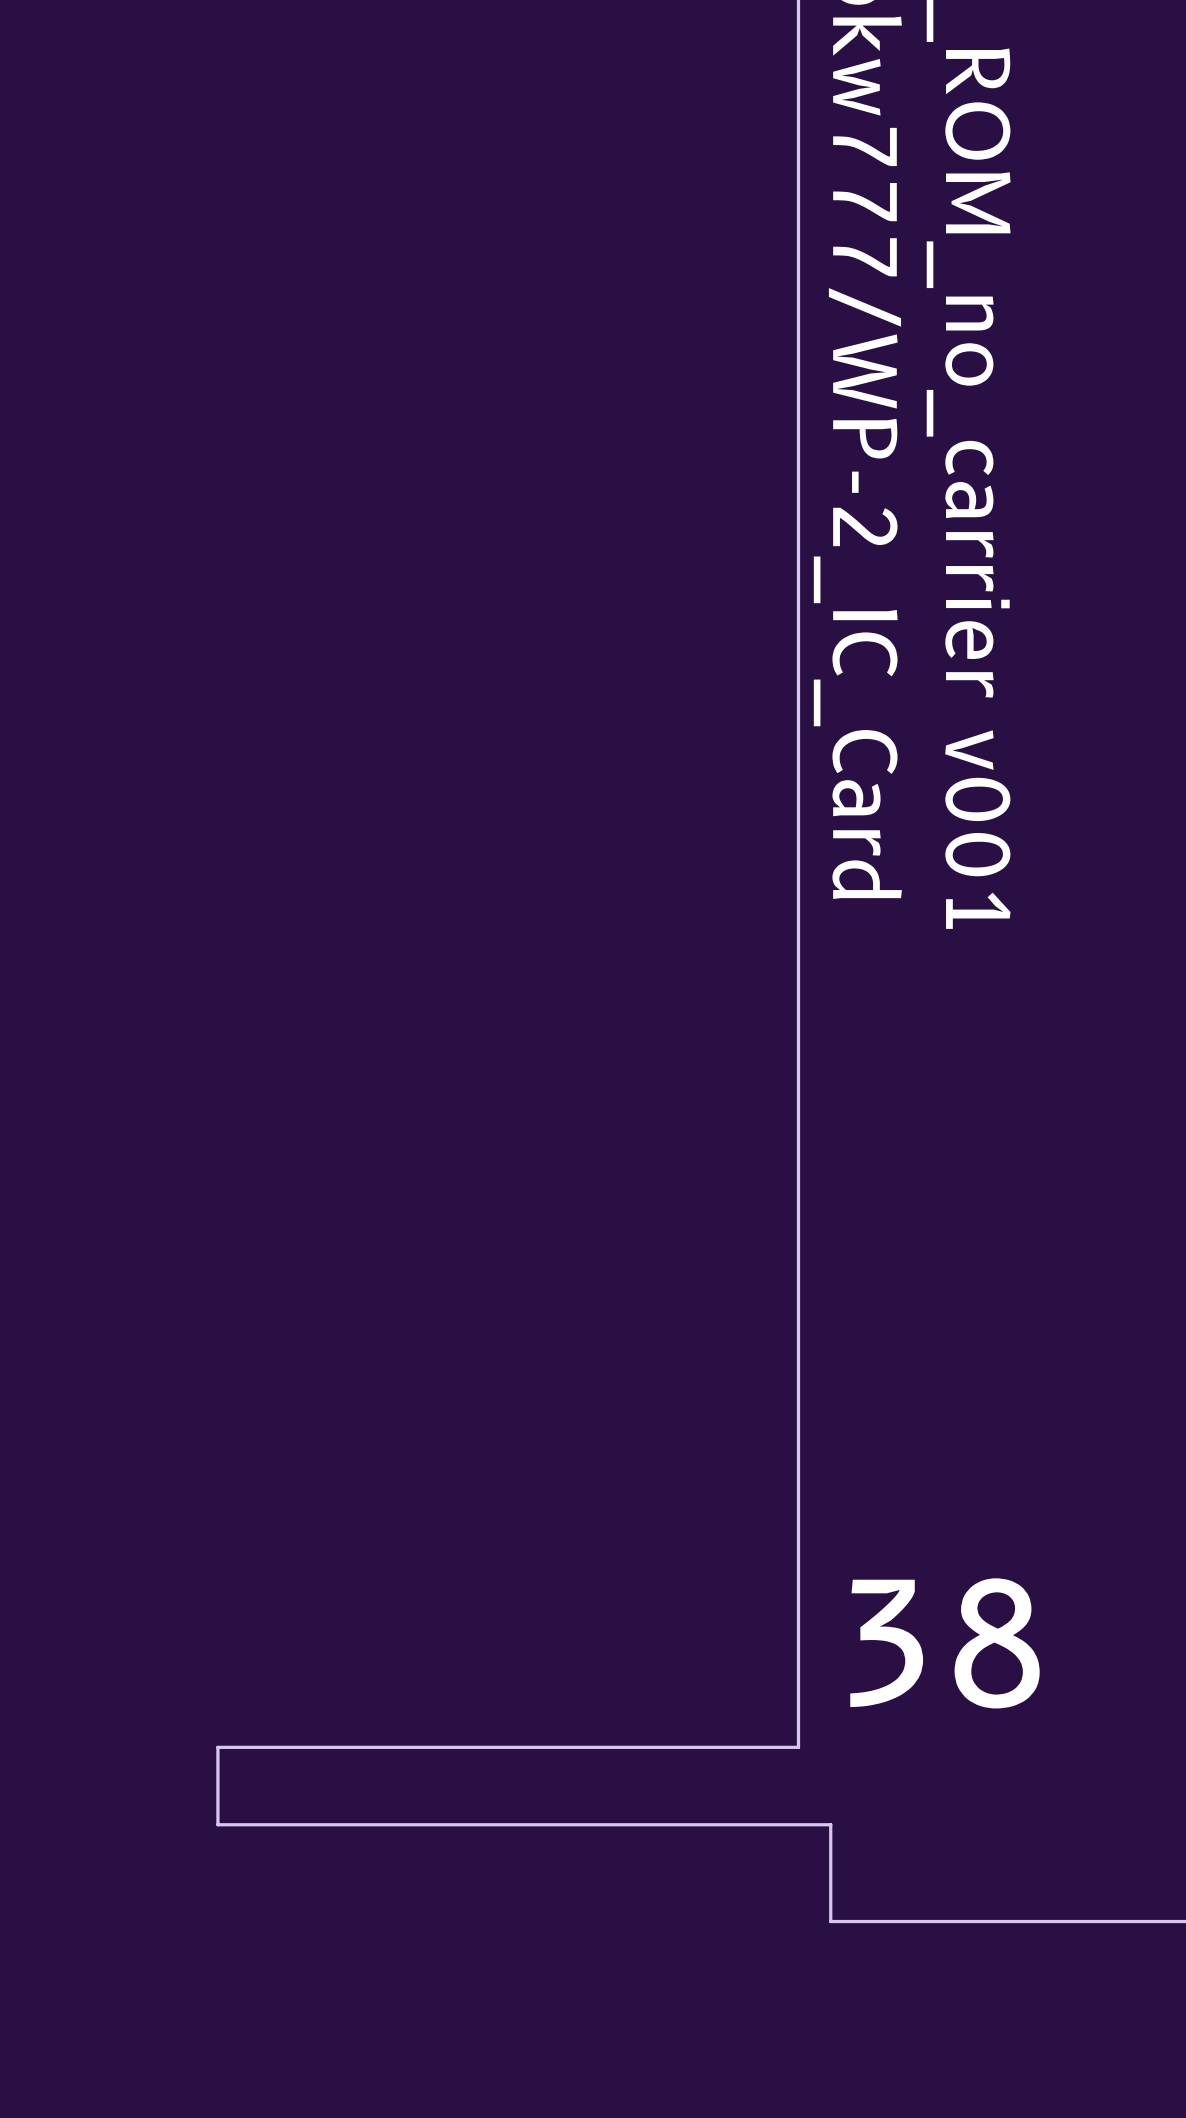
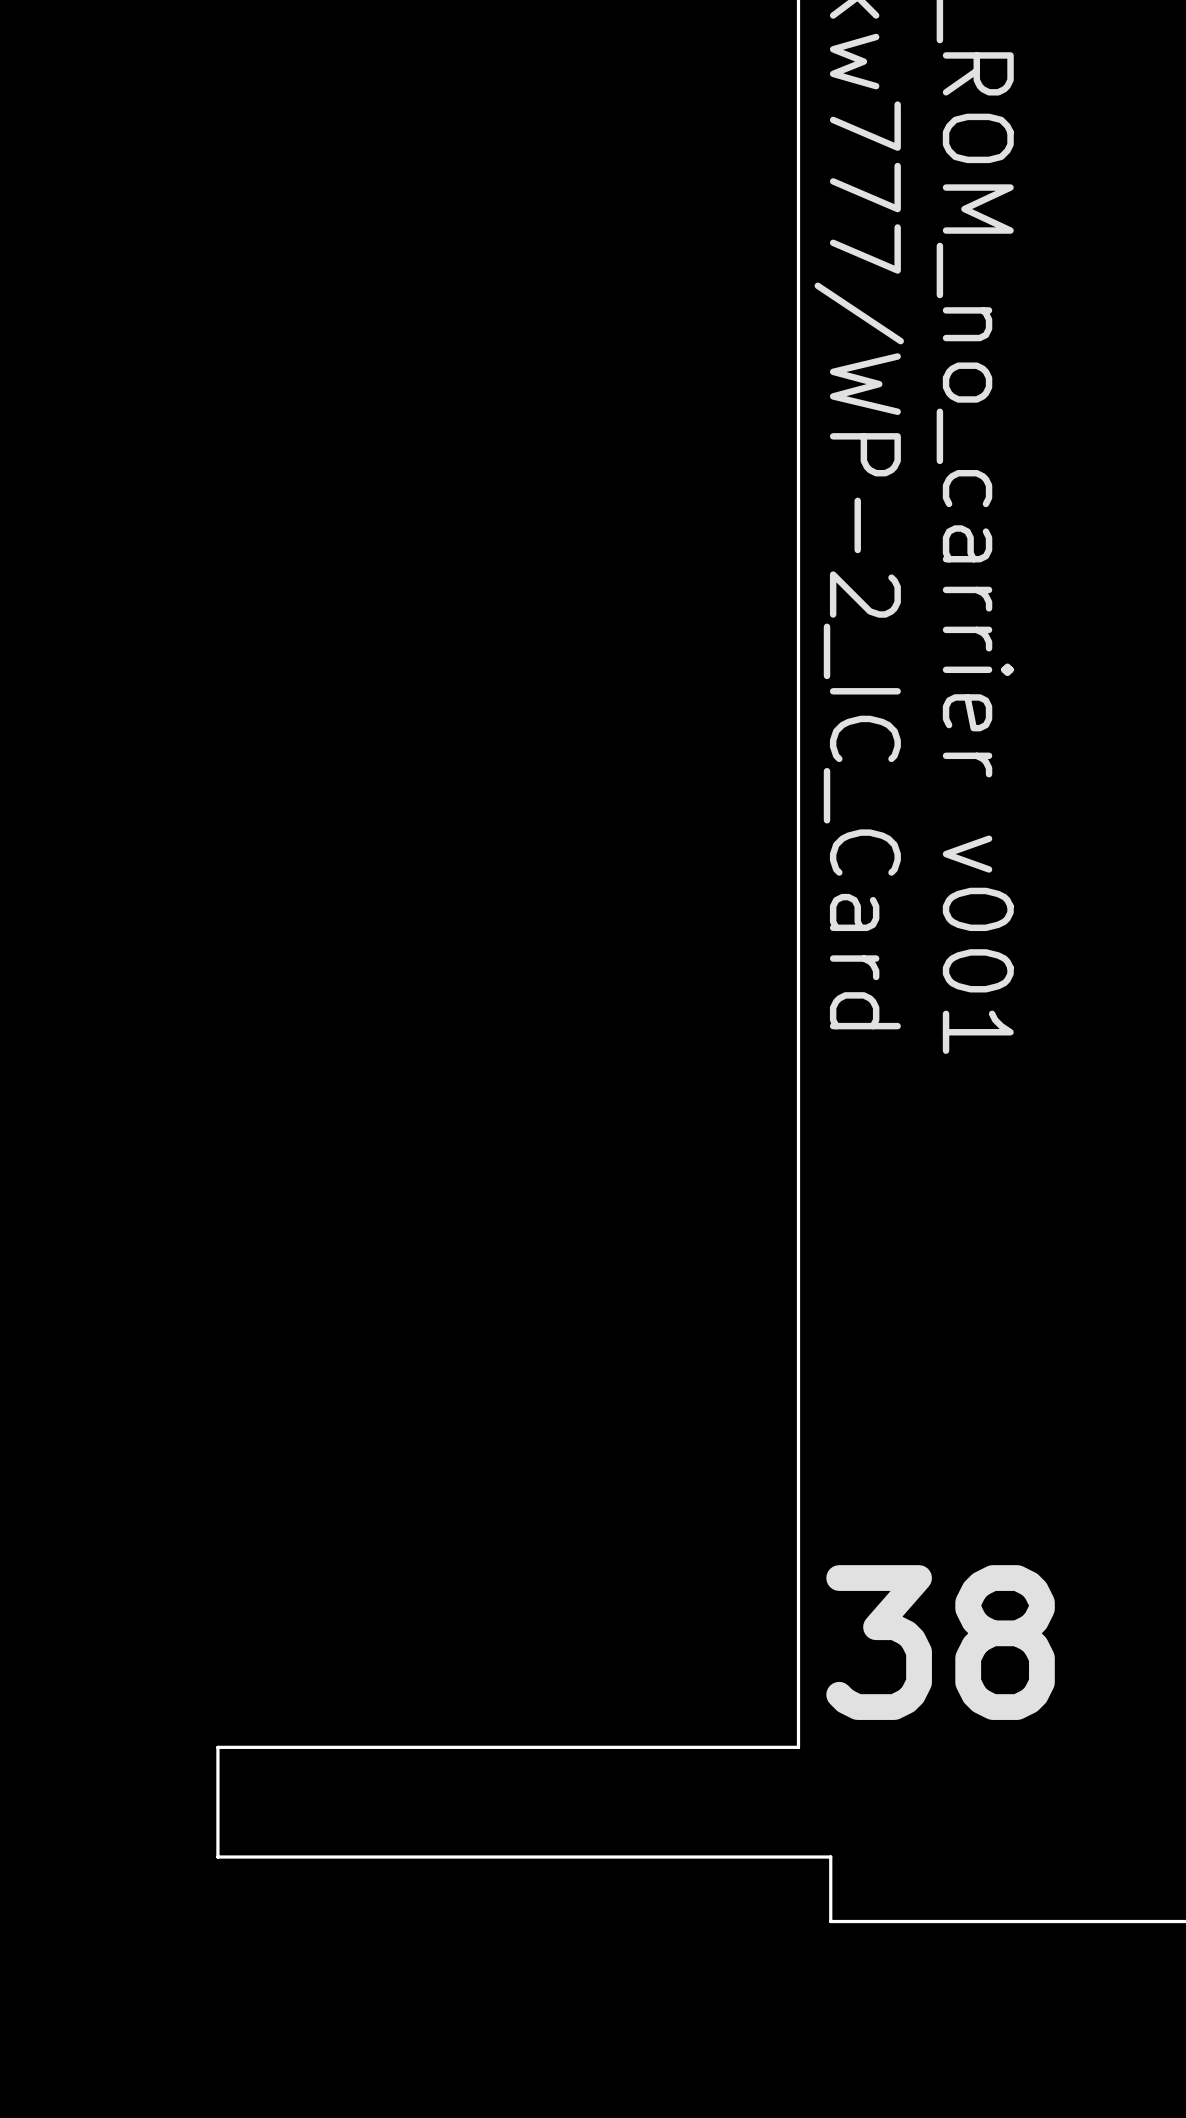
board edge: (217, 1824) (830, 1824) (830, 1857) -> (217, 1824) (217, 1857) (830, 1857)

